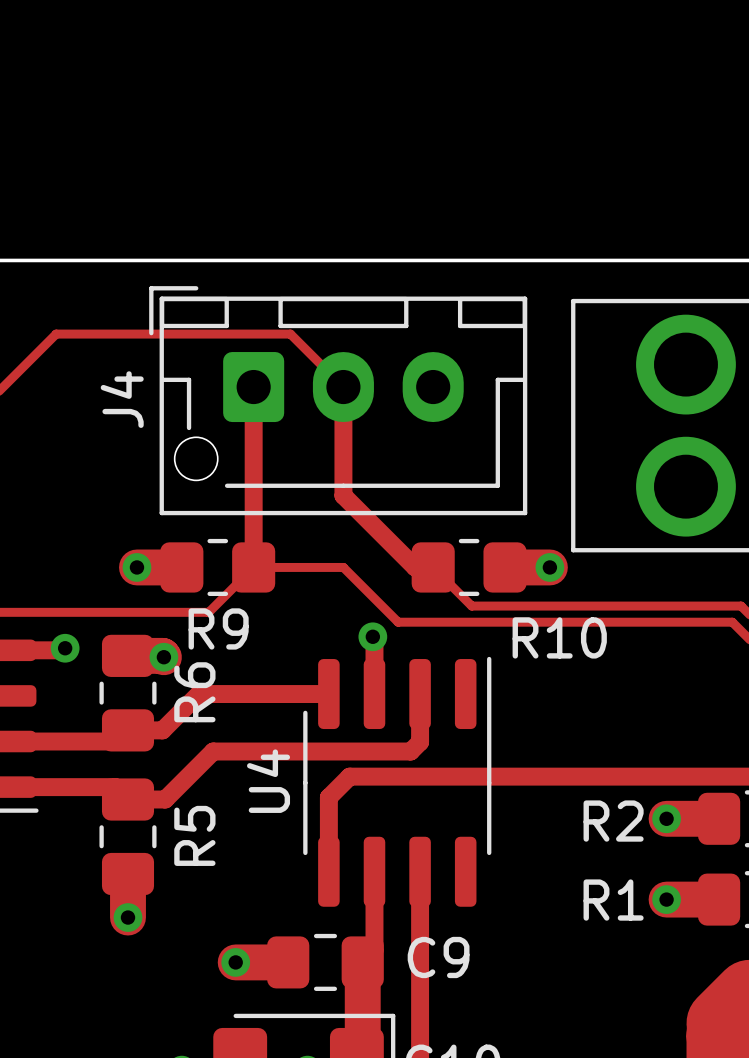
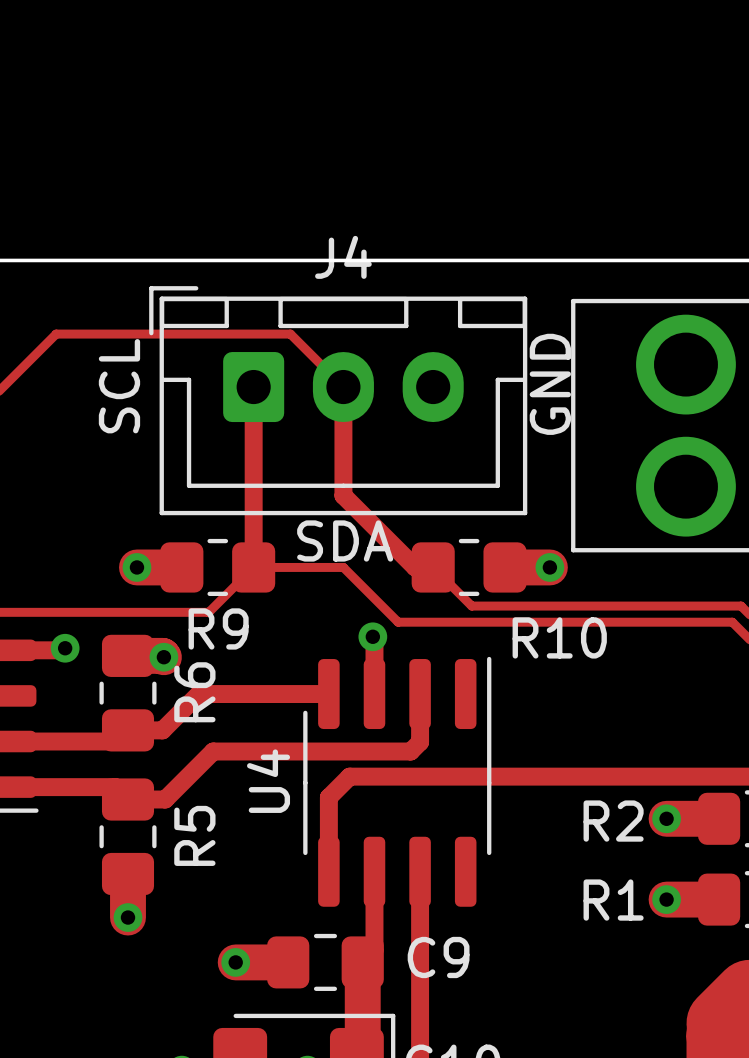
J4 footprint: [149, 286, 528, 516] -> [149, 286, 528, 516]
text: none -> GND (550, 384)
text: none -> SCL (119, 386)
J4 name position: J4 (122, 399) -> J4 (343, 257)
text: none -> SDA (345, 540)

